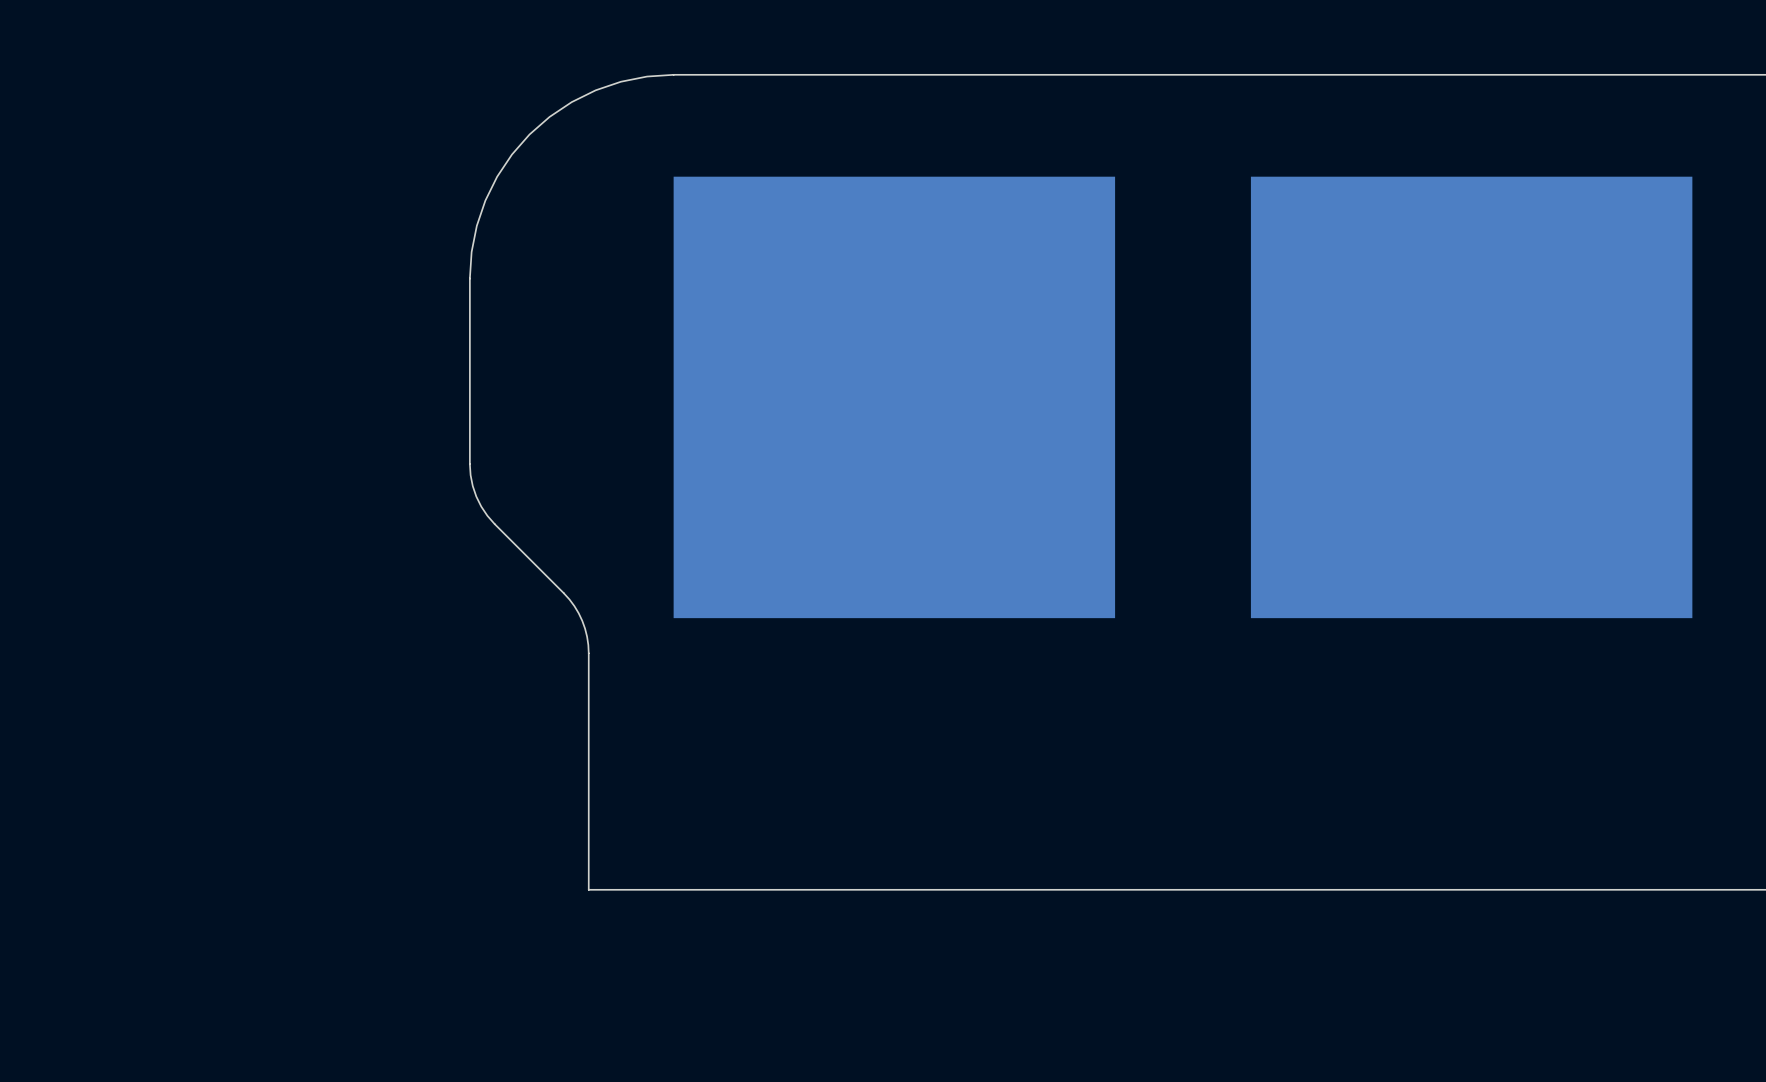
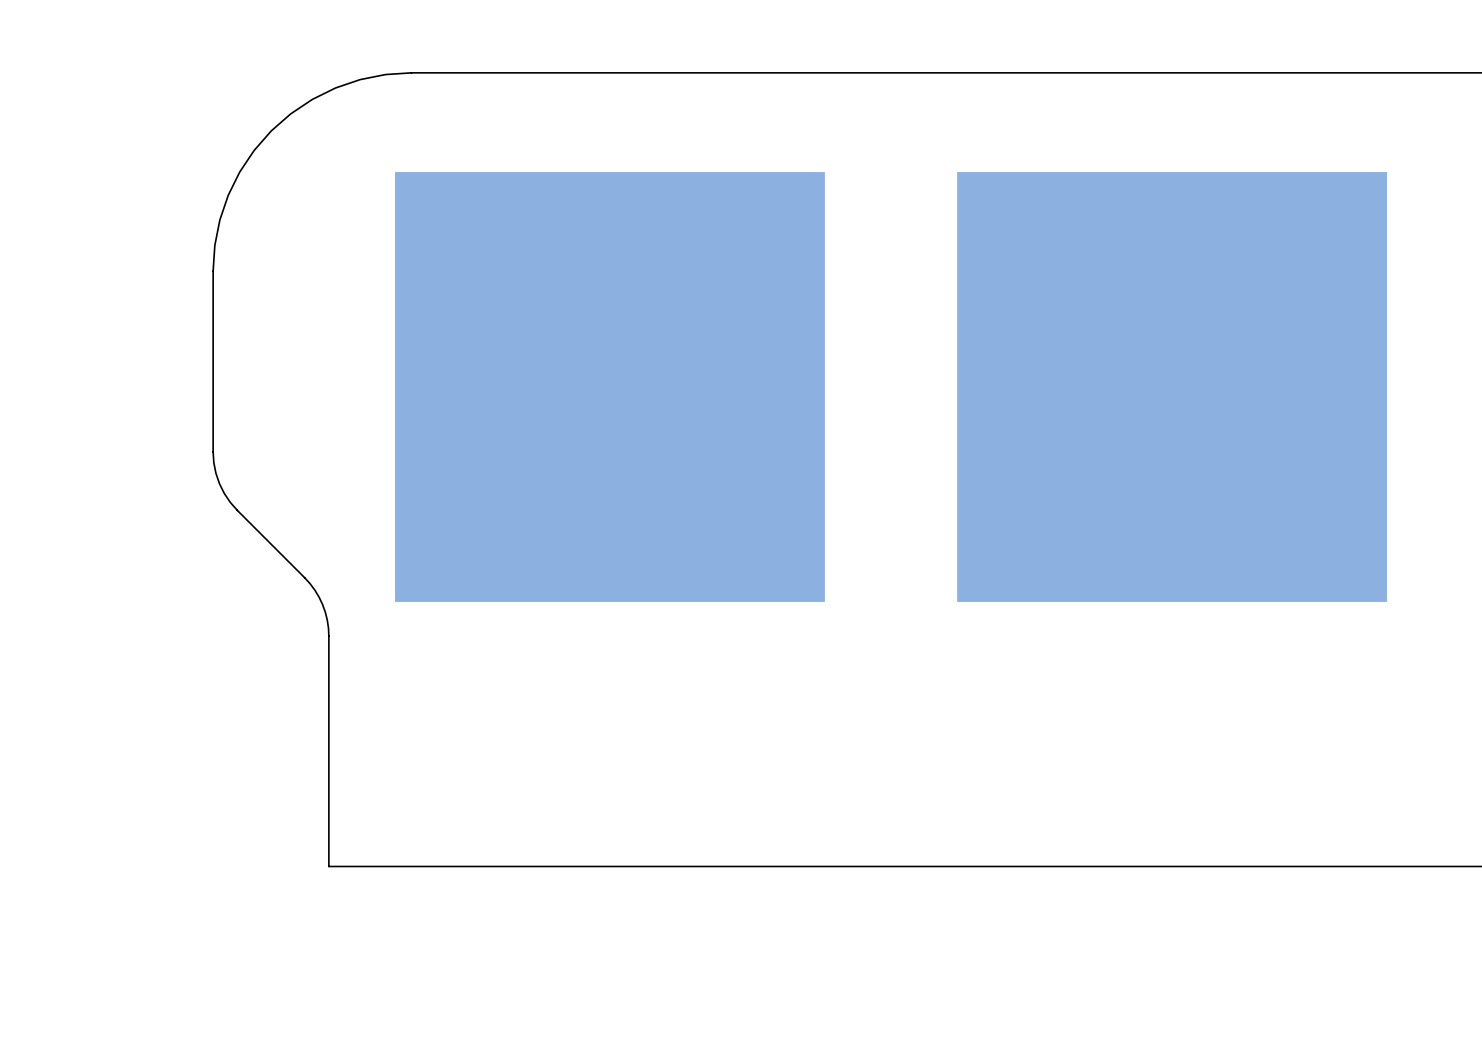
part position: (894, 397) -> (609, 387)
part position: (1471, 397) -> (1172, 387)

